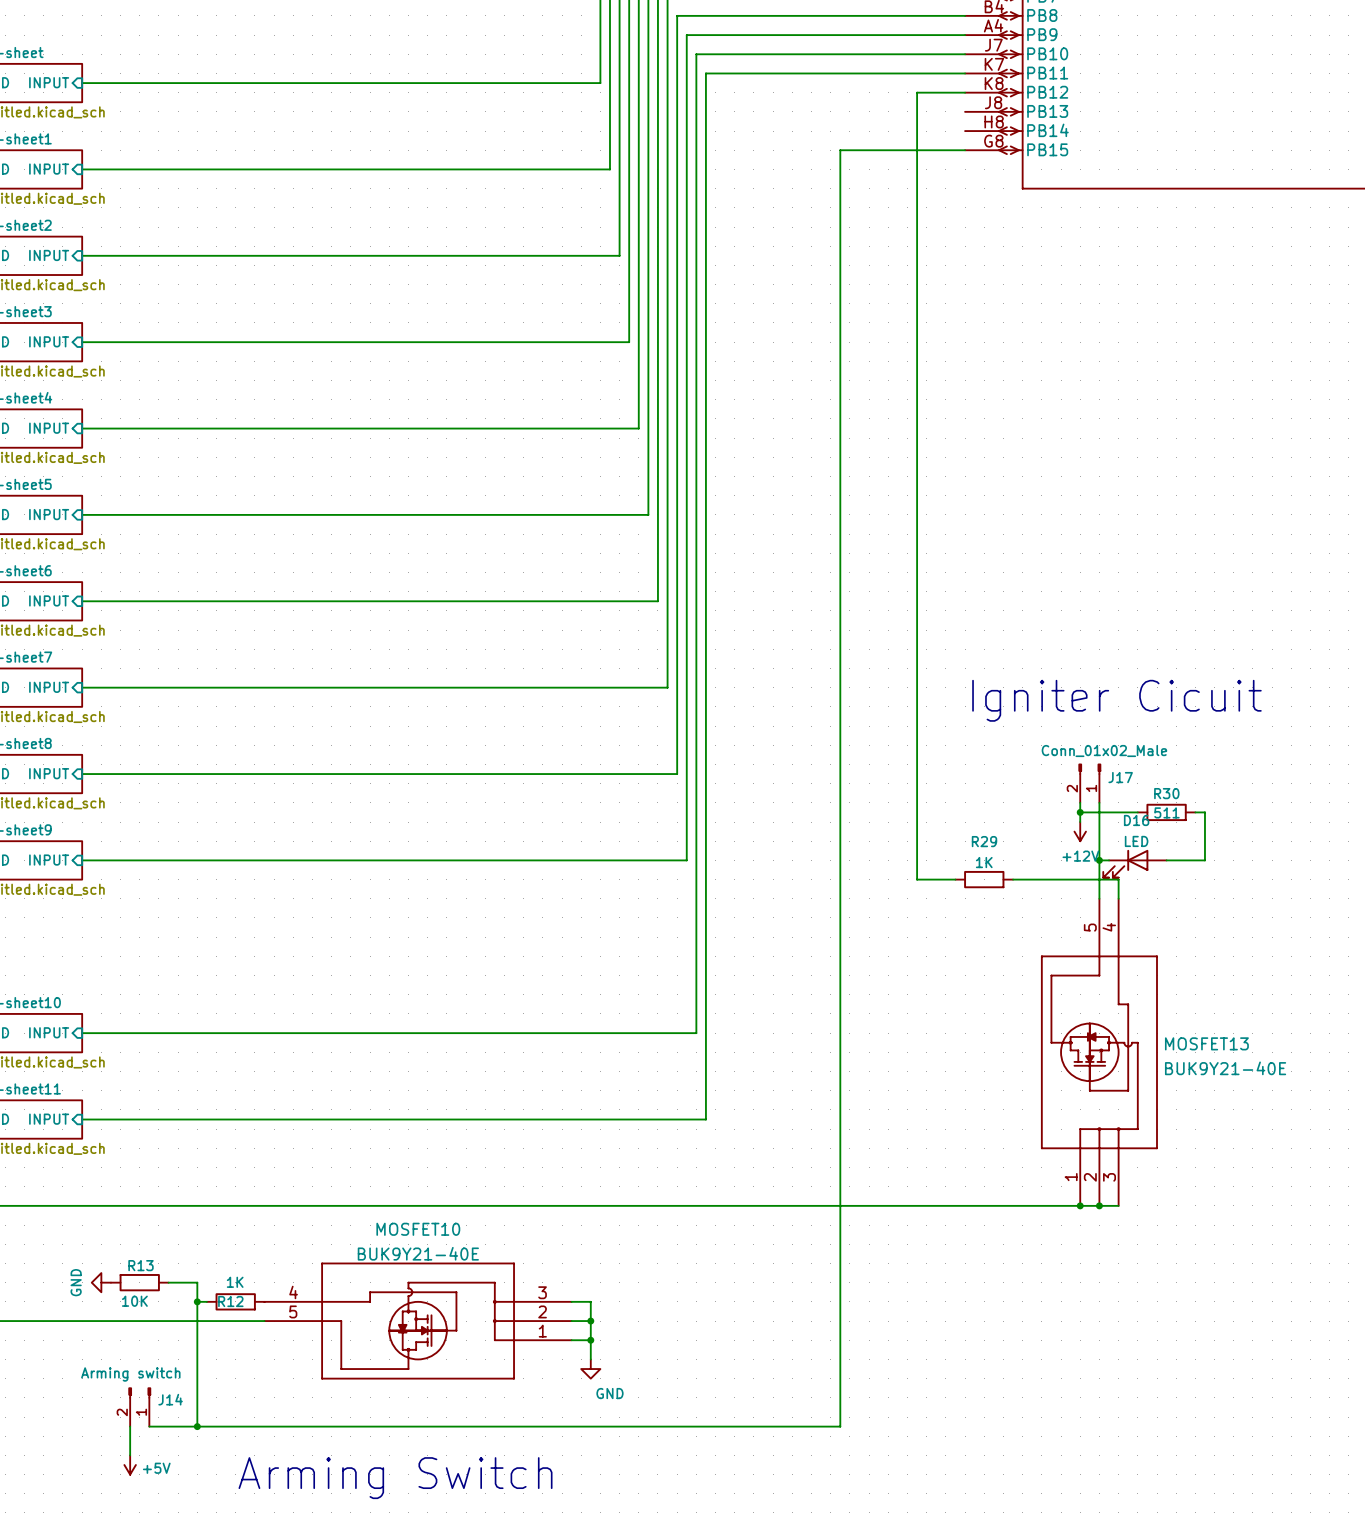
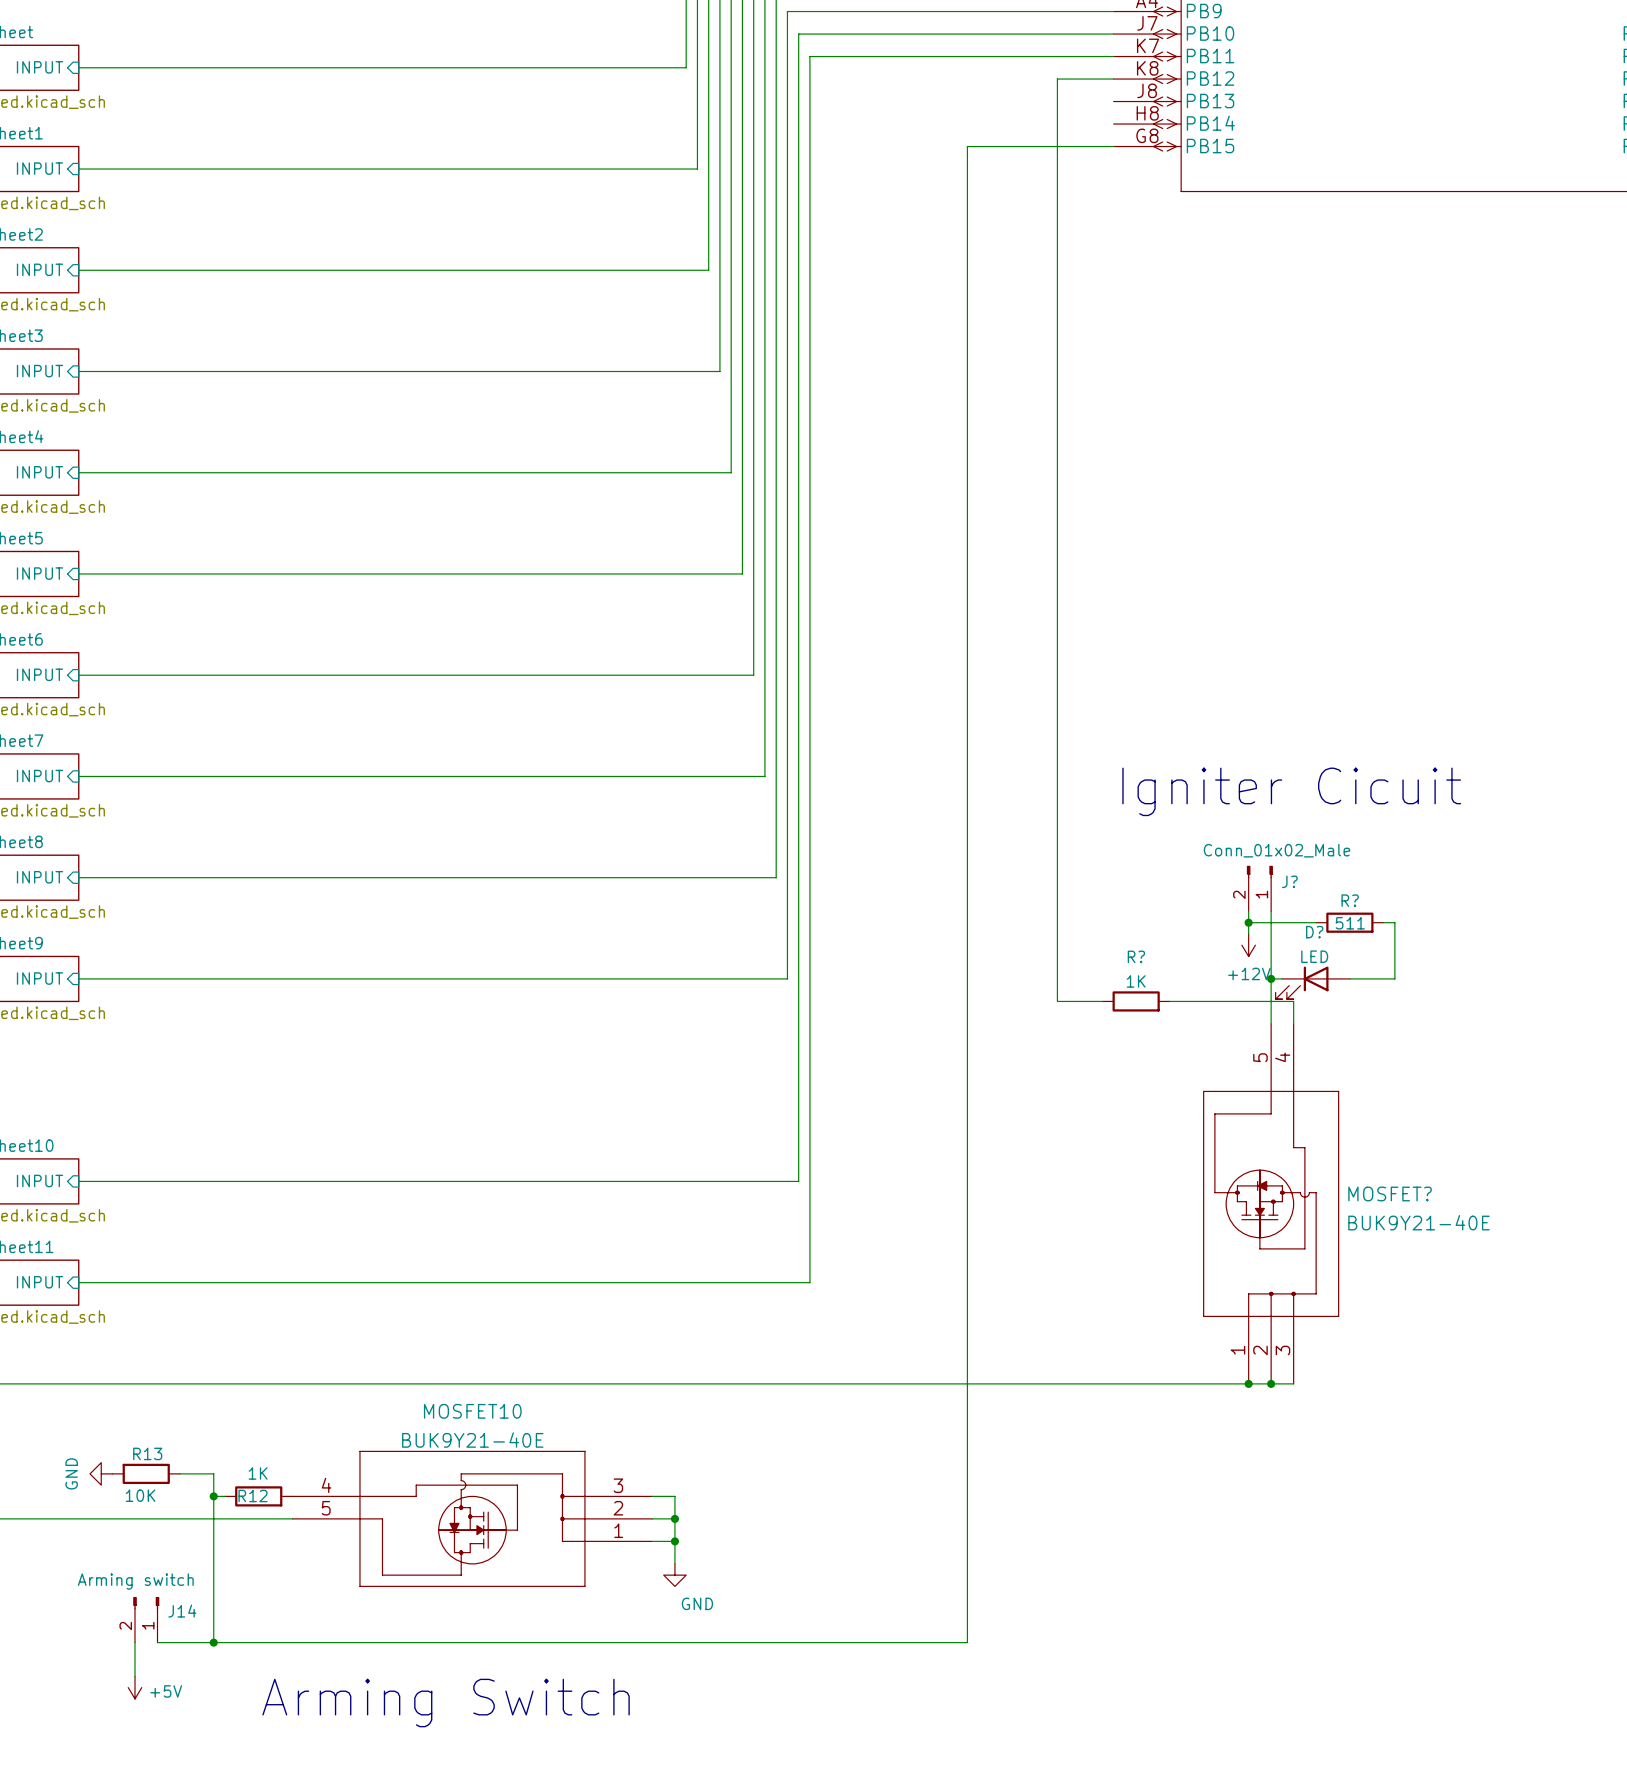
J17 name: J17 (1120, 777) -> J? (1289, 881)
R30 name: R30 (1166, 793) -> R? (1350, 900)
D16 name: D16 (1136, 820) -> D? (1314, 932)
R29 name: R29 (984, 841) -> R? (1136, 956)
MOSFET13 name: MOSFET13 (1206, 1043) -> MOSFET? (1390, 1193)

